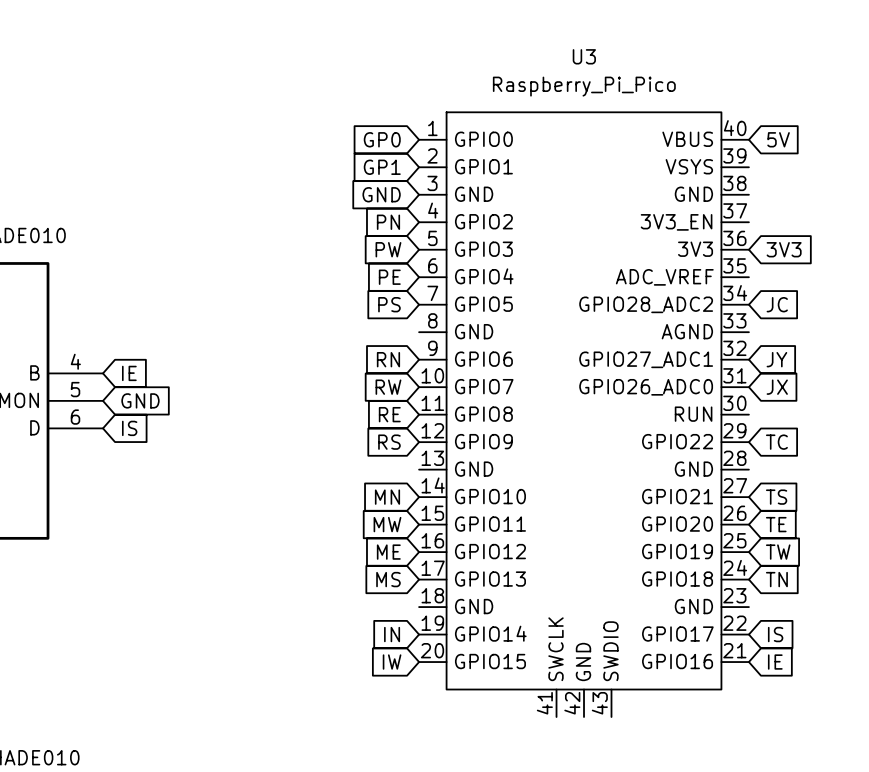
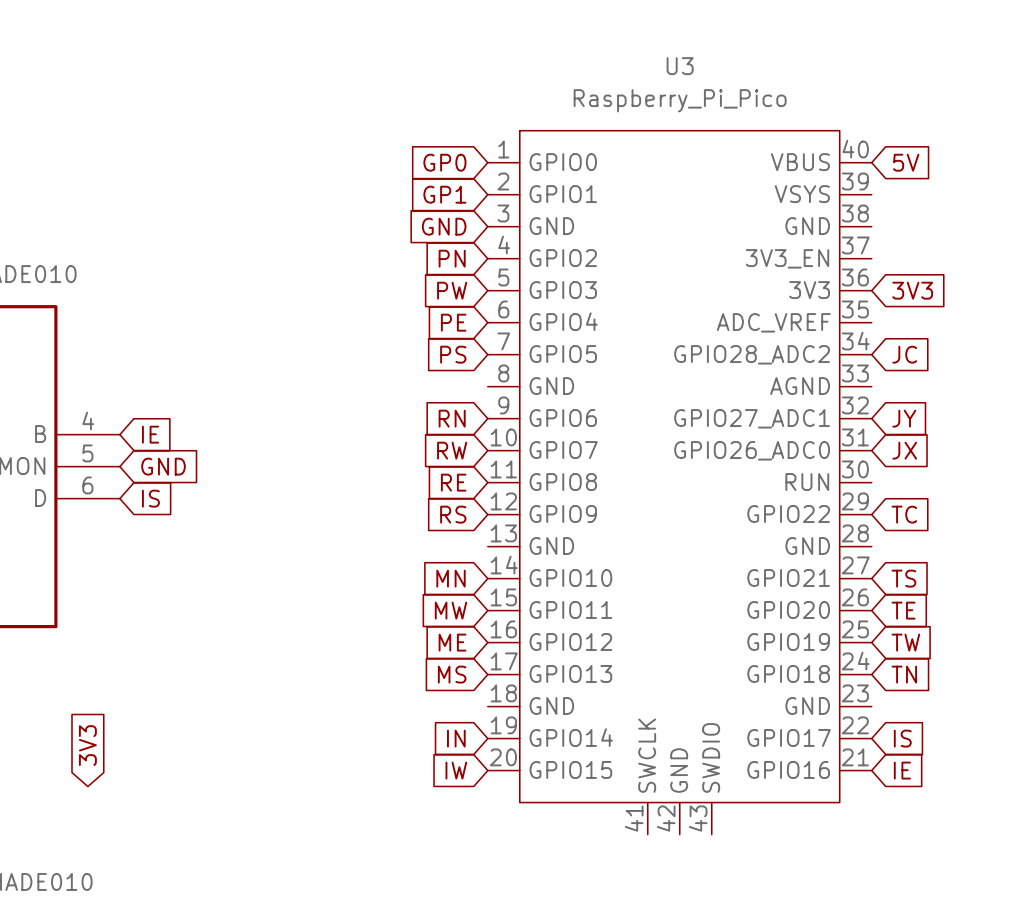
global label: none -> 3V3 (87, 745)

